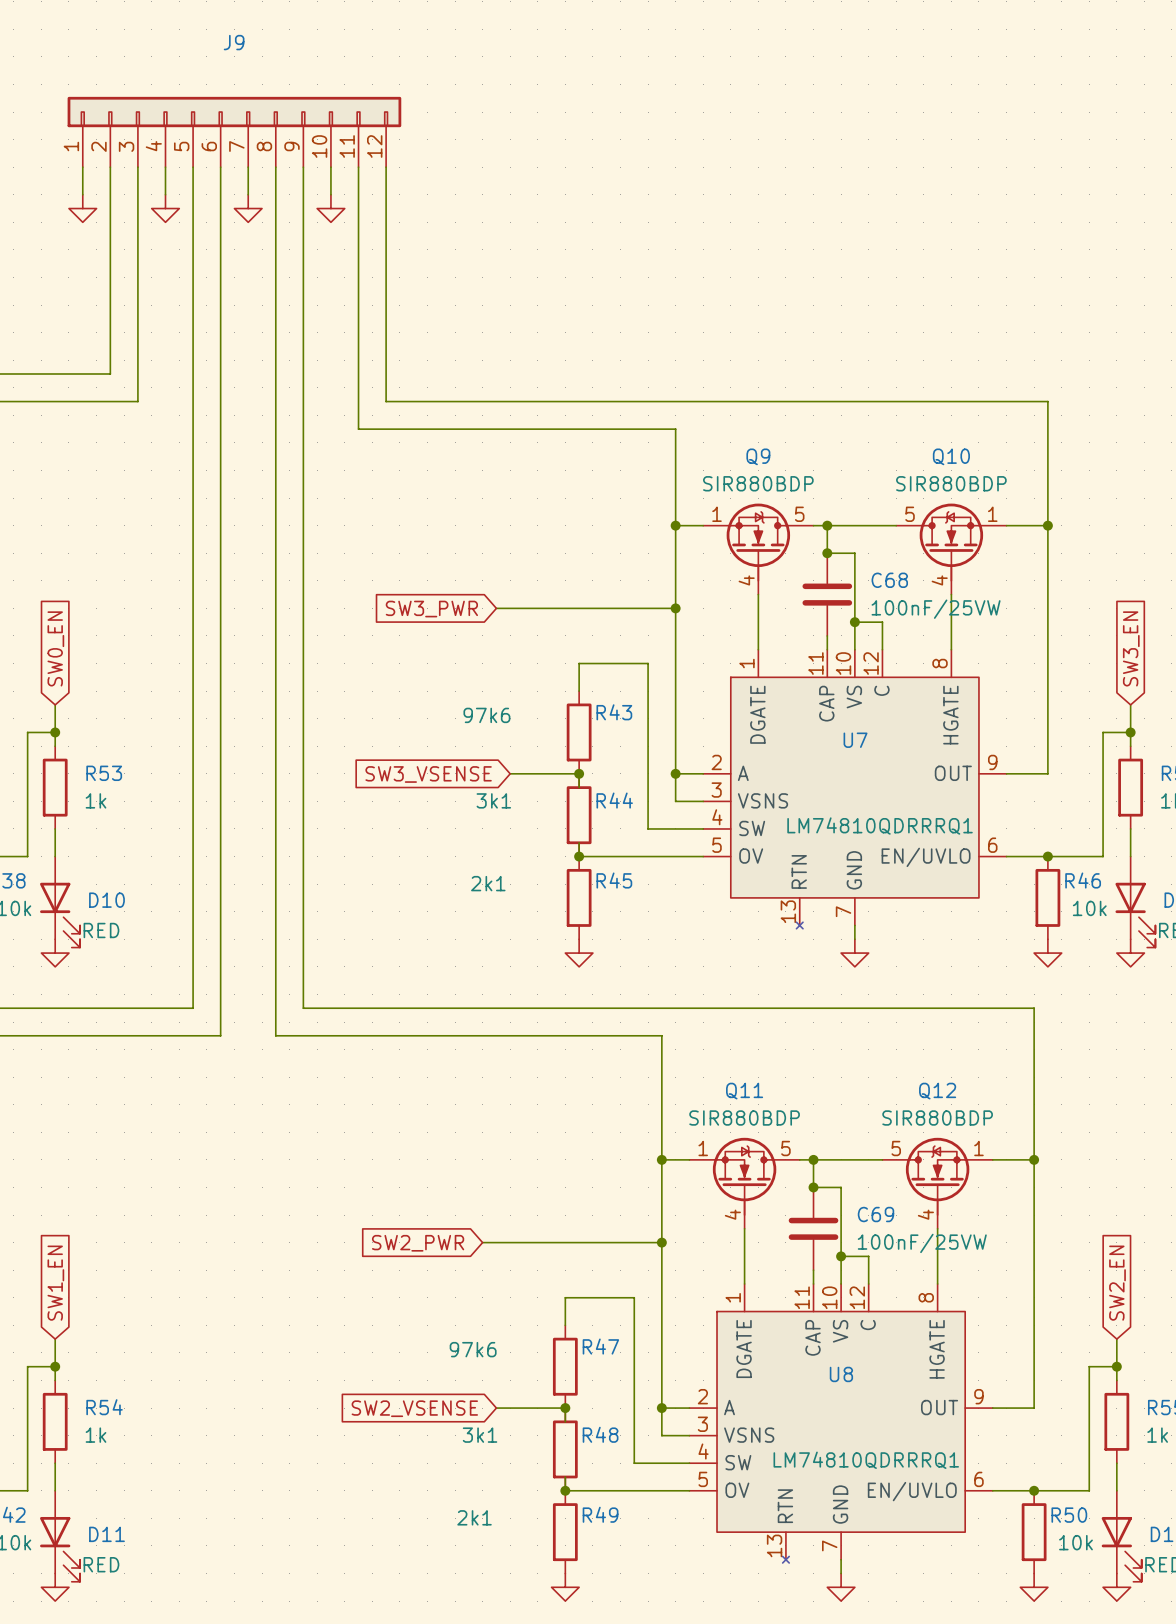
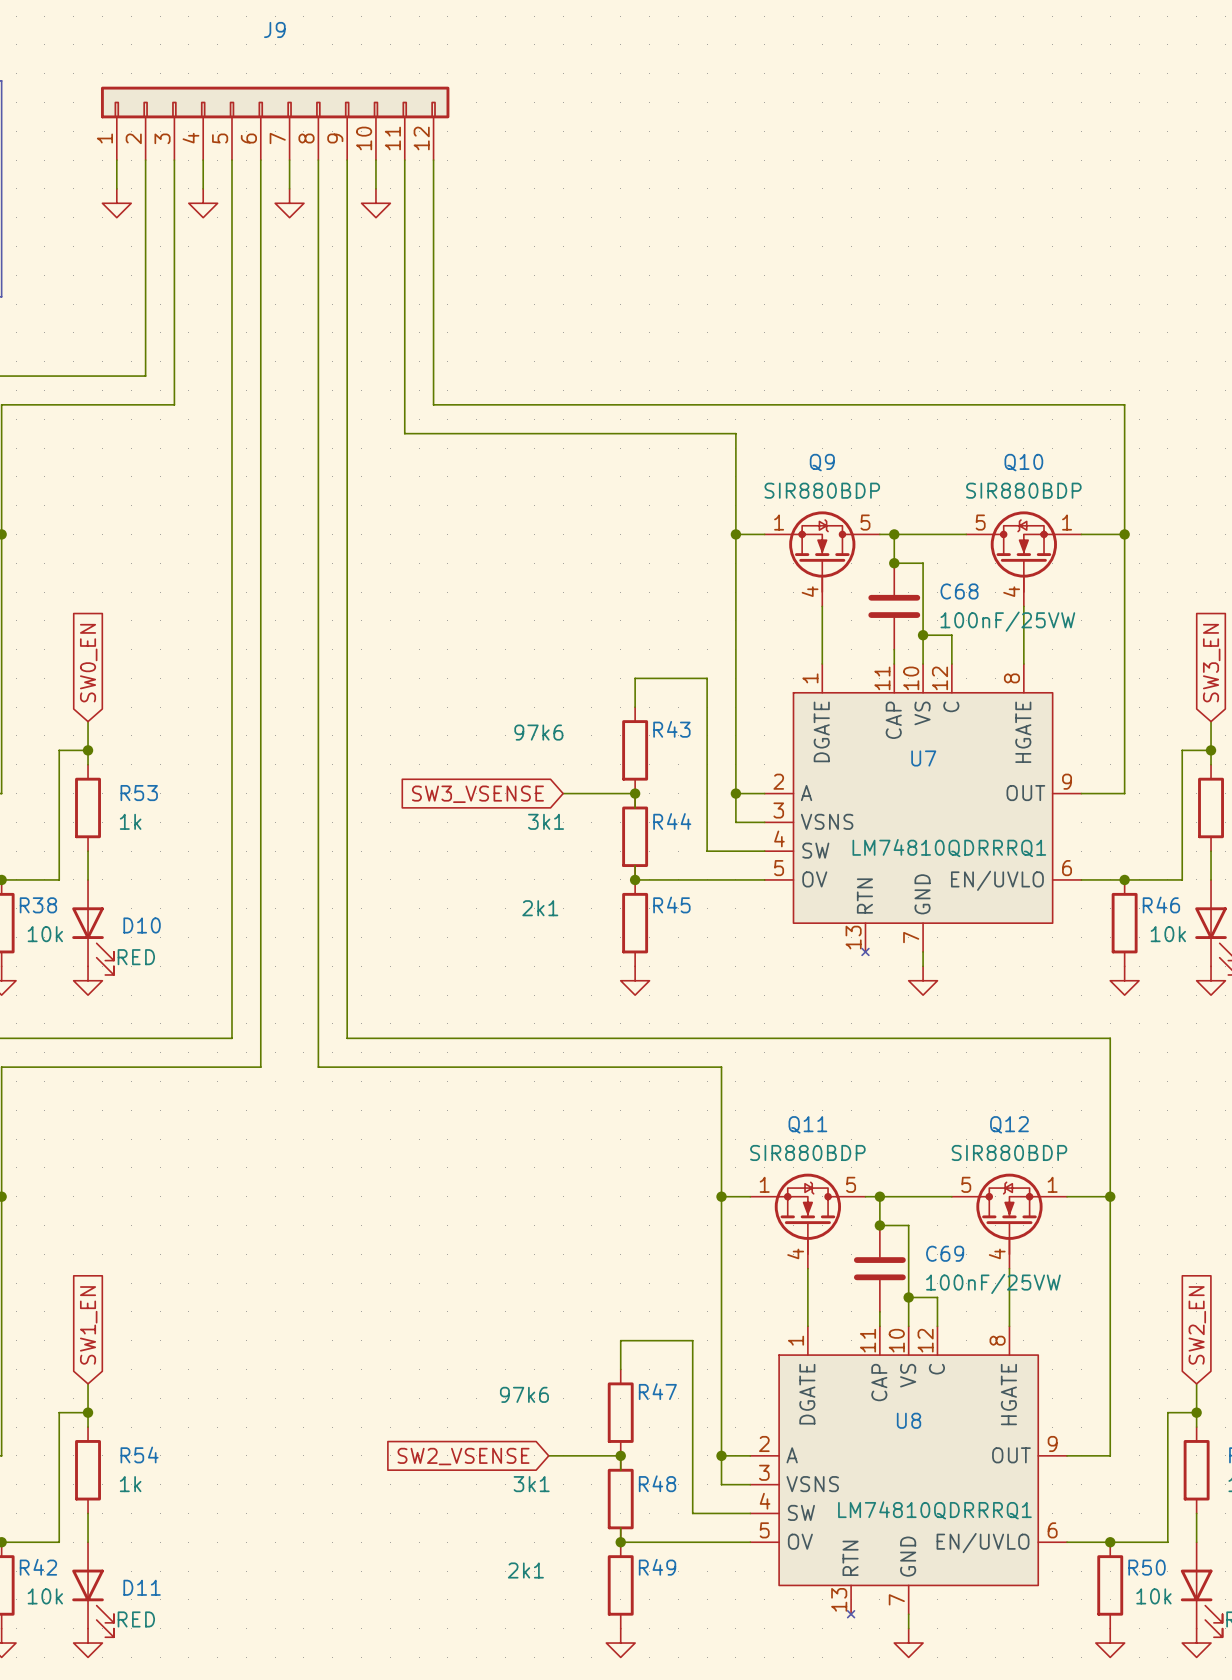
wire: (496, 608) (675, 608) -> none
junction: (675, 608) -> none
global label: SW3_PWR (431, 609) -> none
wire: (482, 1242) (661, 1242) -> none
junction: (661, 1242) -> none
global label: SW2_PWR (418, 1243) -> none

